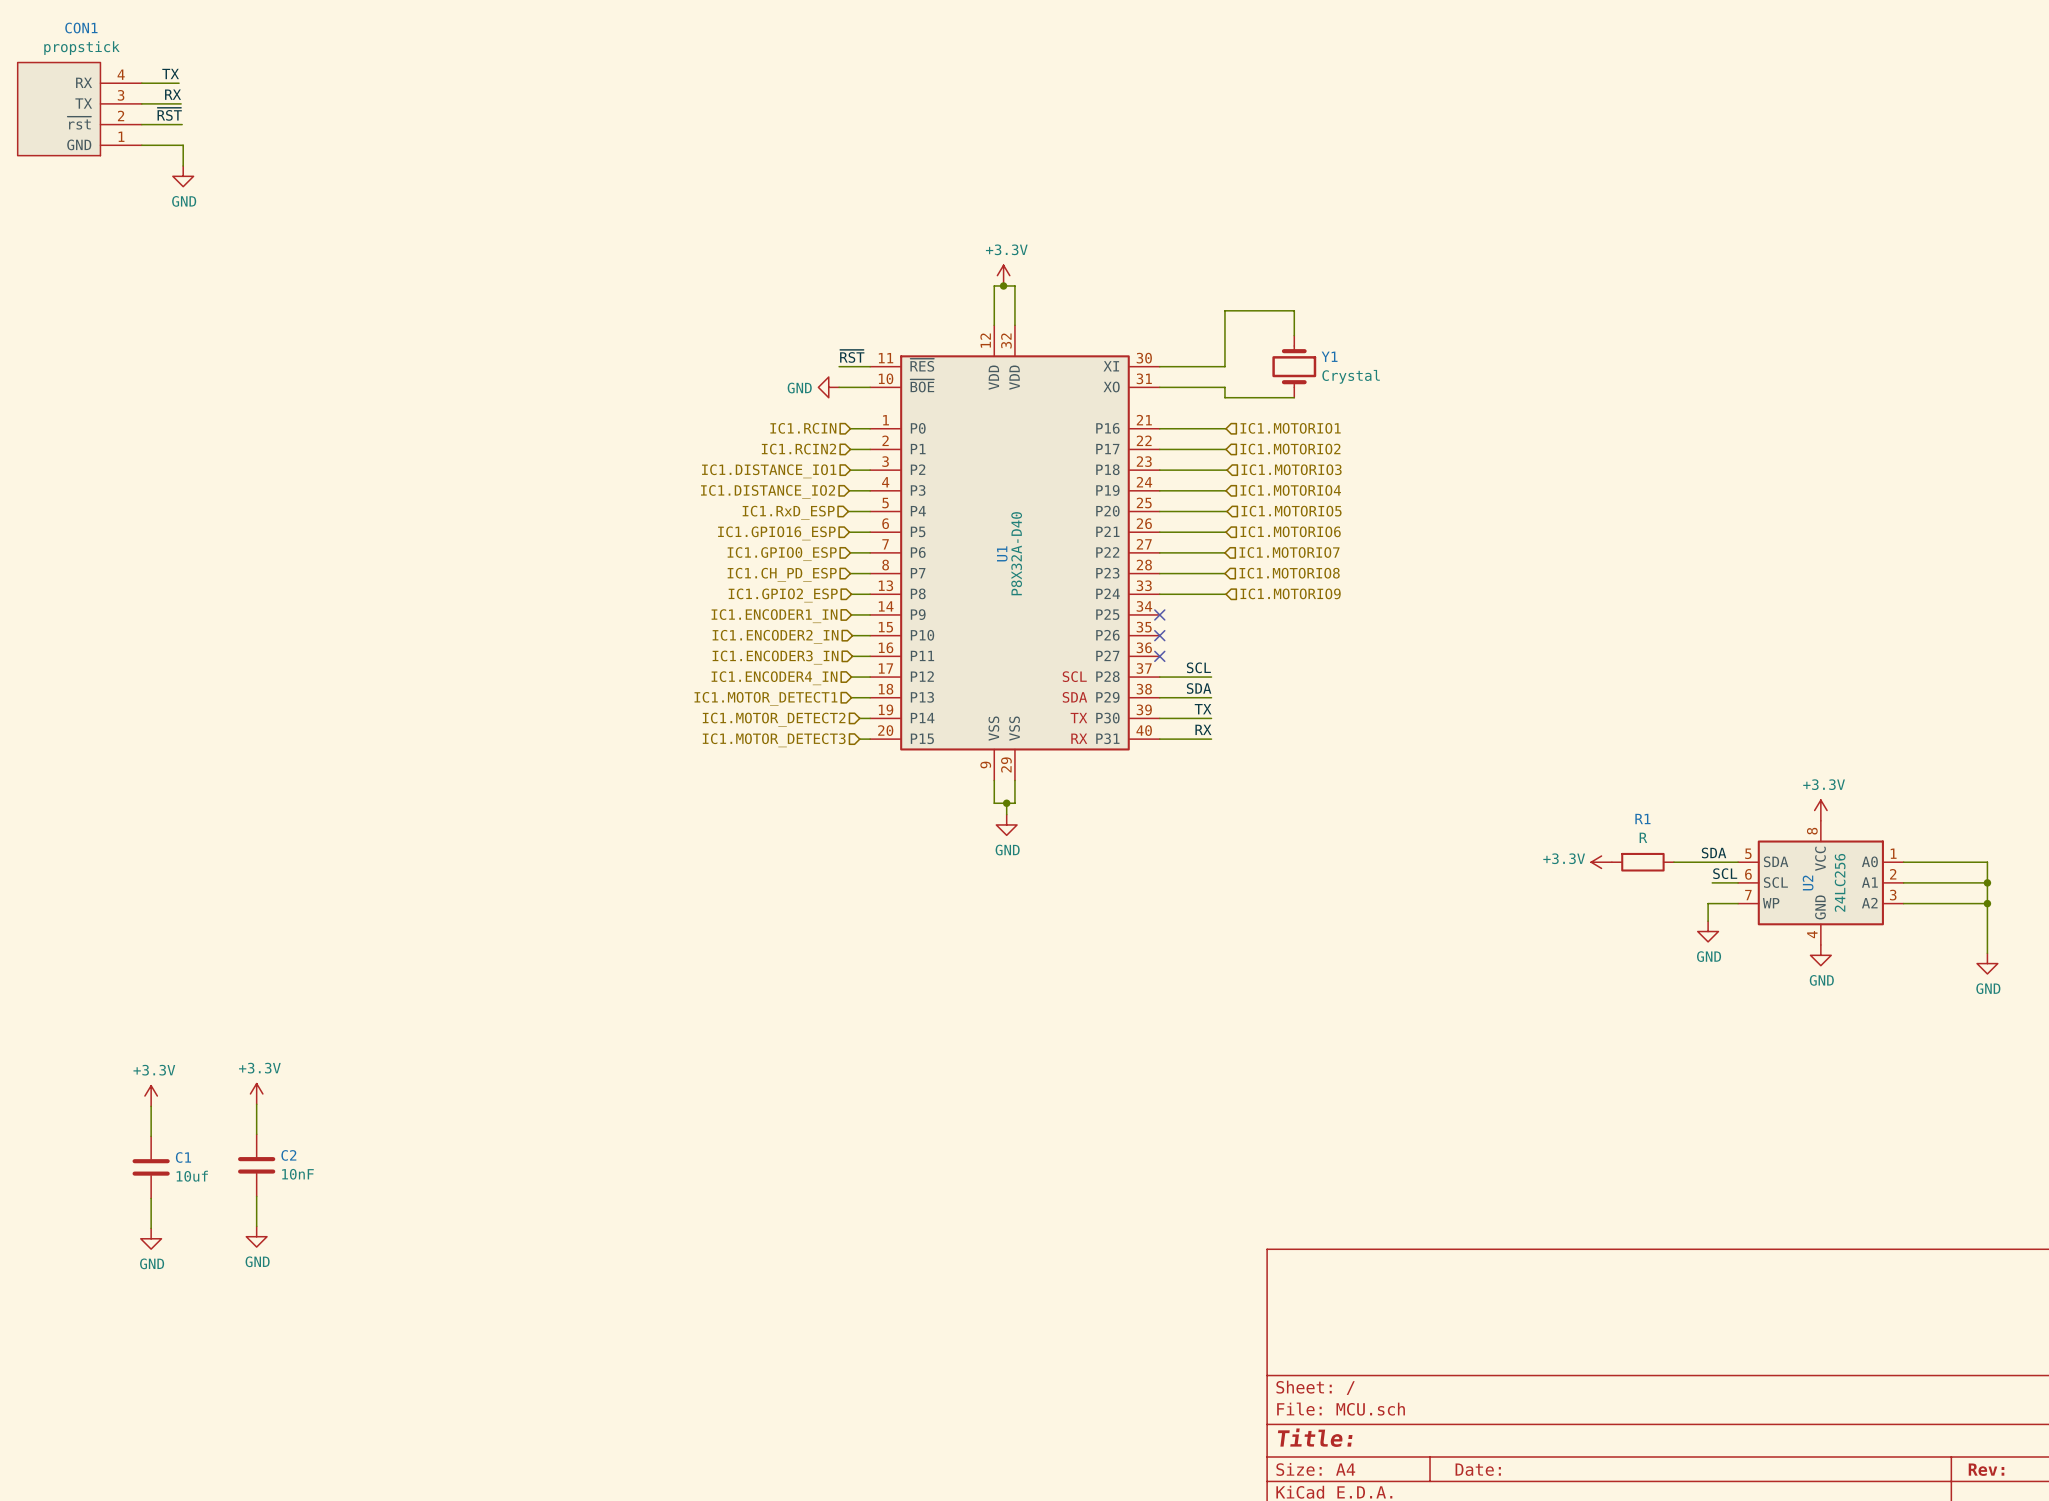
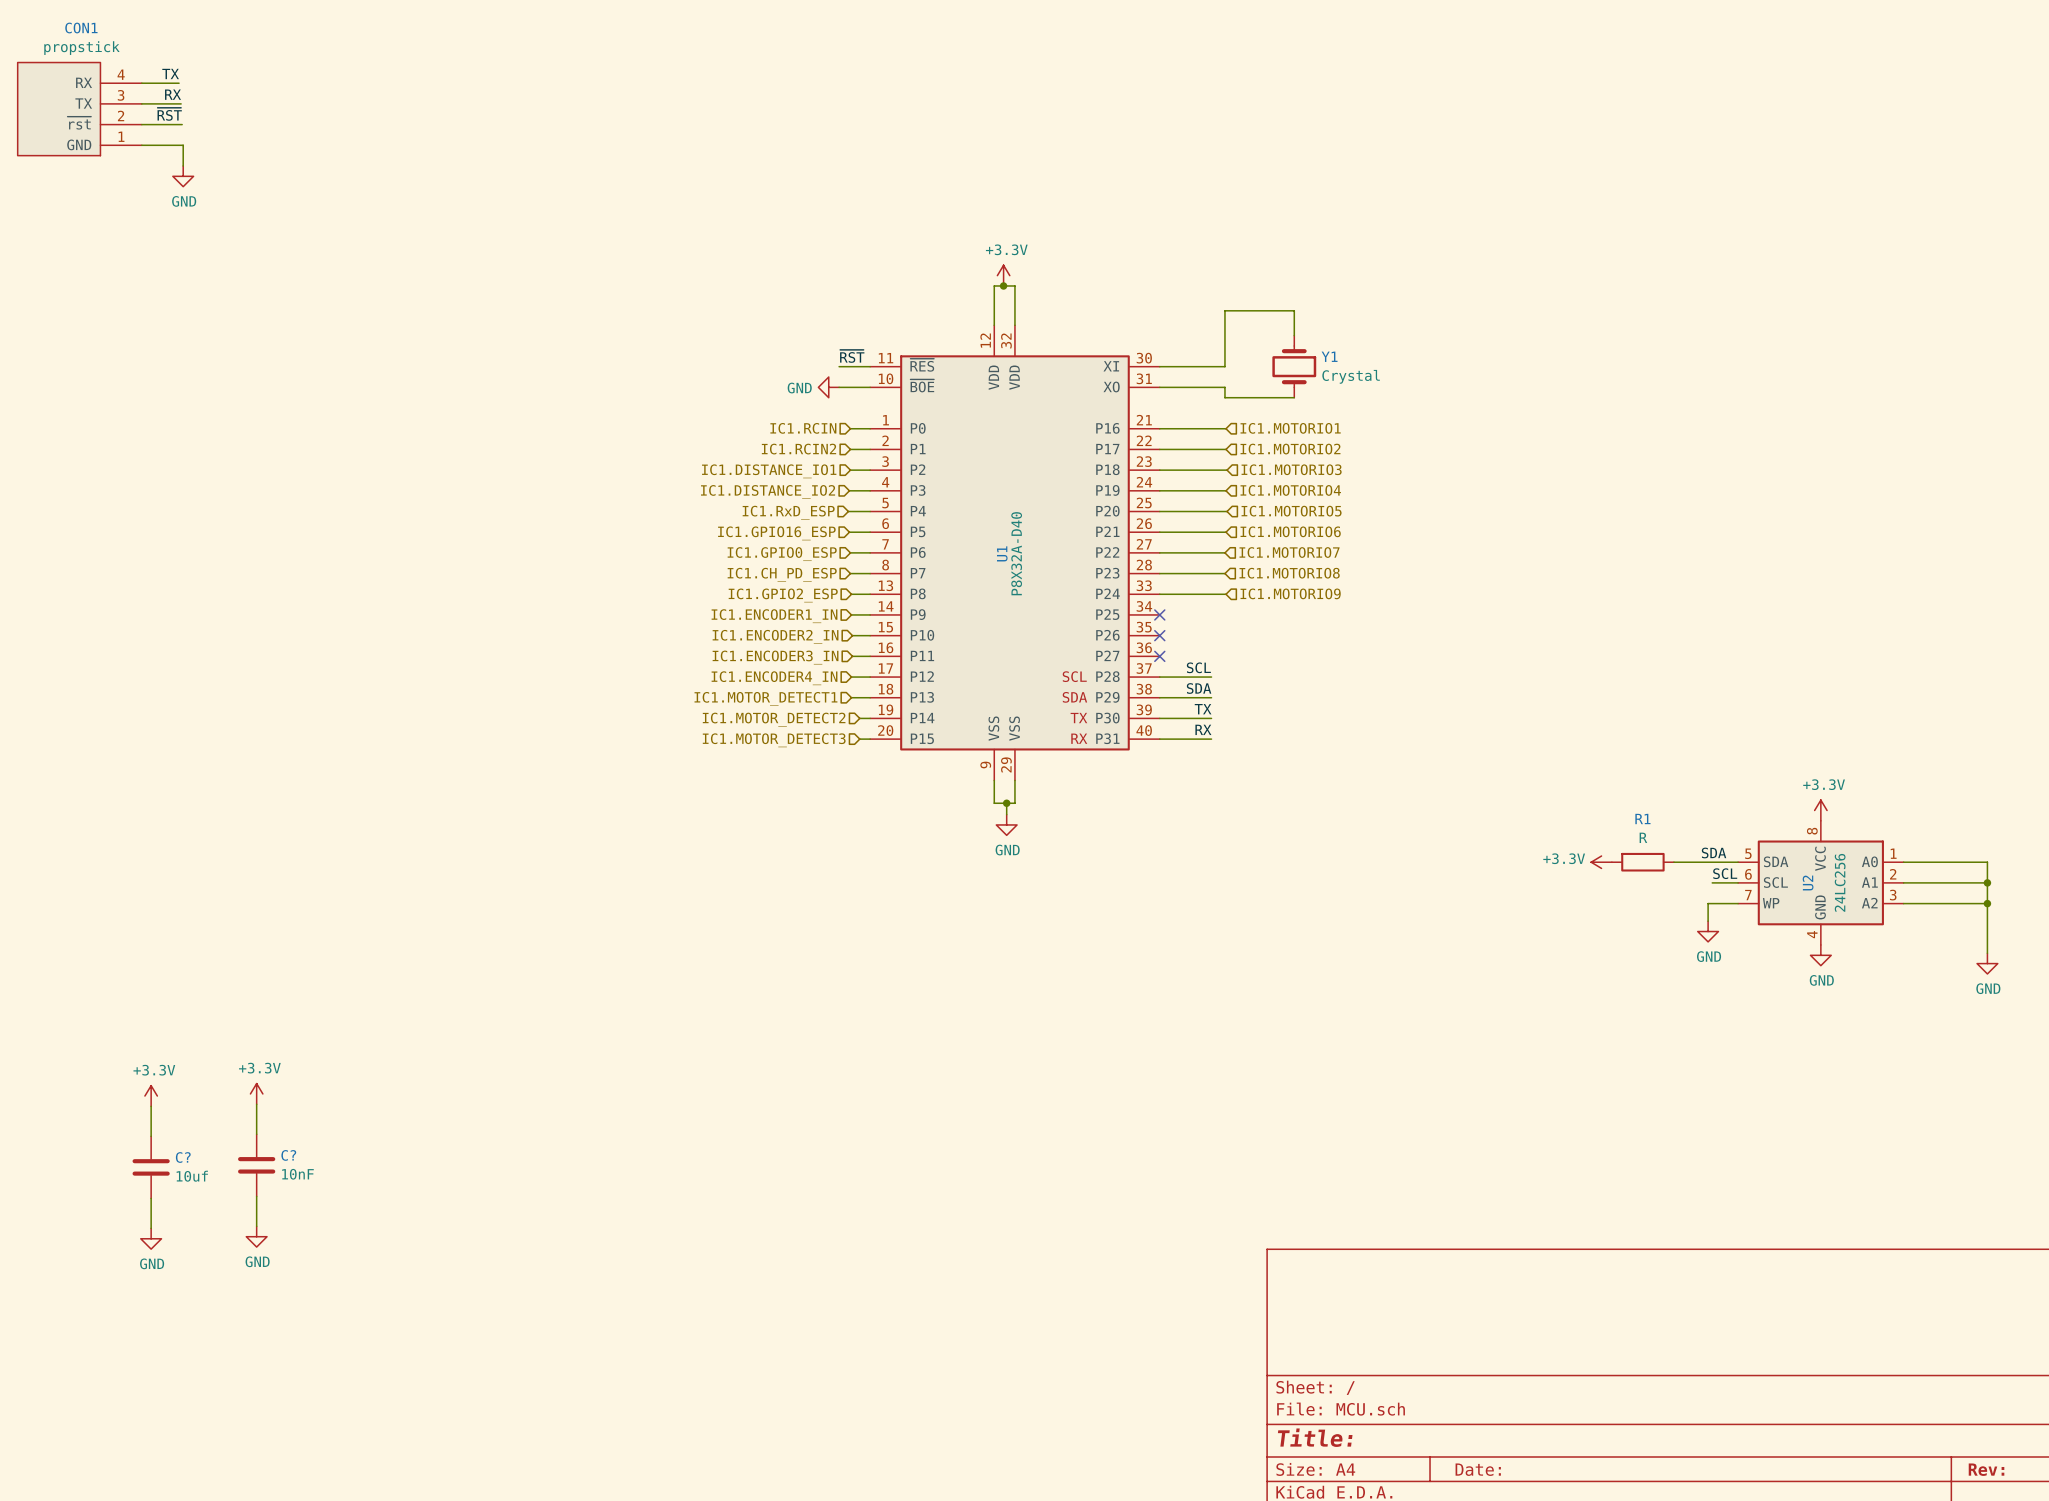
C2 name: C2 (288, 1155) -> C? (288, 1155)
C1 name: C1 (183, 1157) -> C? (183, 1157)

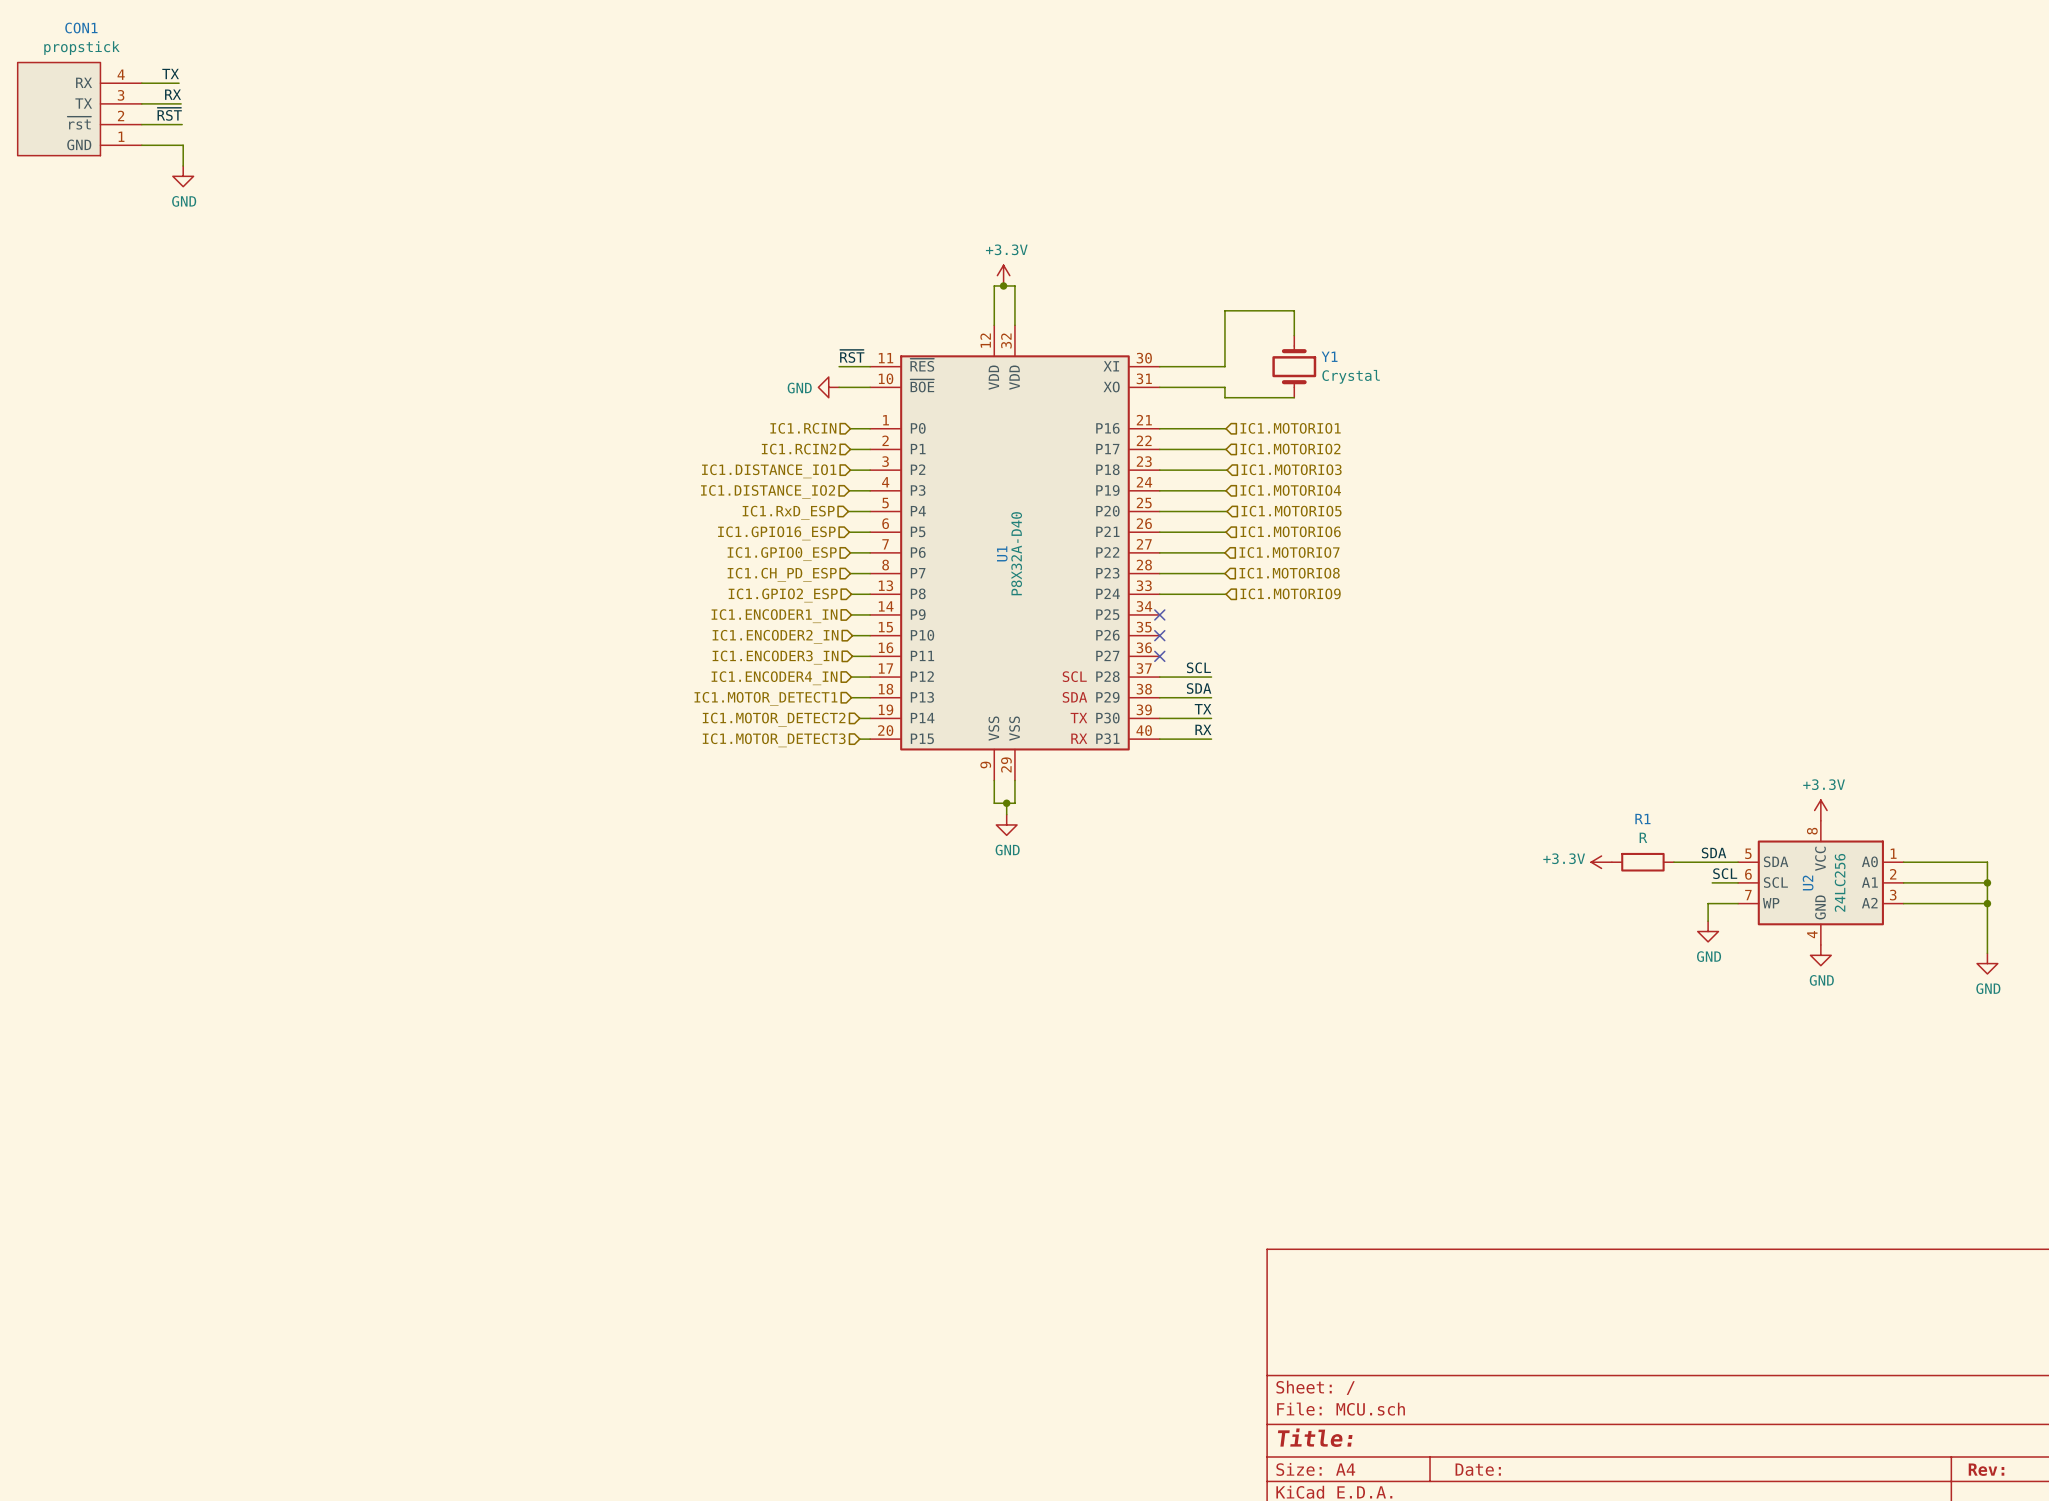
power symbol: +3.3V (256, 1093) -> none
power symbol: +3.3V (151, 1096) -> none
wire: (256, 1104) (256, 1134) -> none
wire: (151, 1106) (151, 1136) -> none
C?: 10nF (256, 1165) -> none
C?: 10uf (151, 1167) -> none
wire: (256, 1196) (256, 1226) -> none
wire: (151, 1198) (151, 1228) -> none
power symbol: GND (256, 1236) -> none
power symbol: GND (151, 1238) -> none

